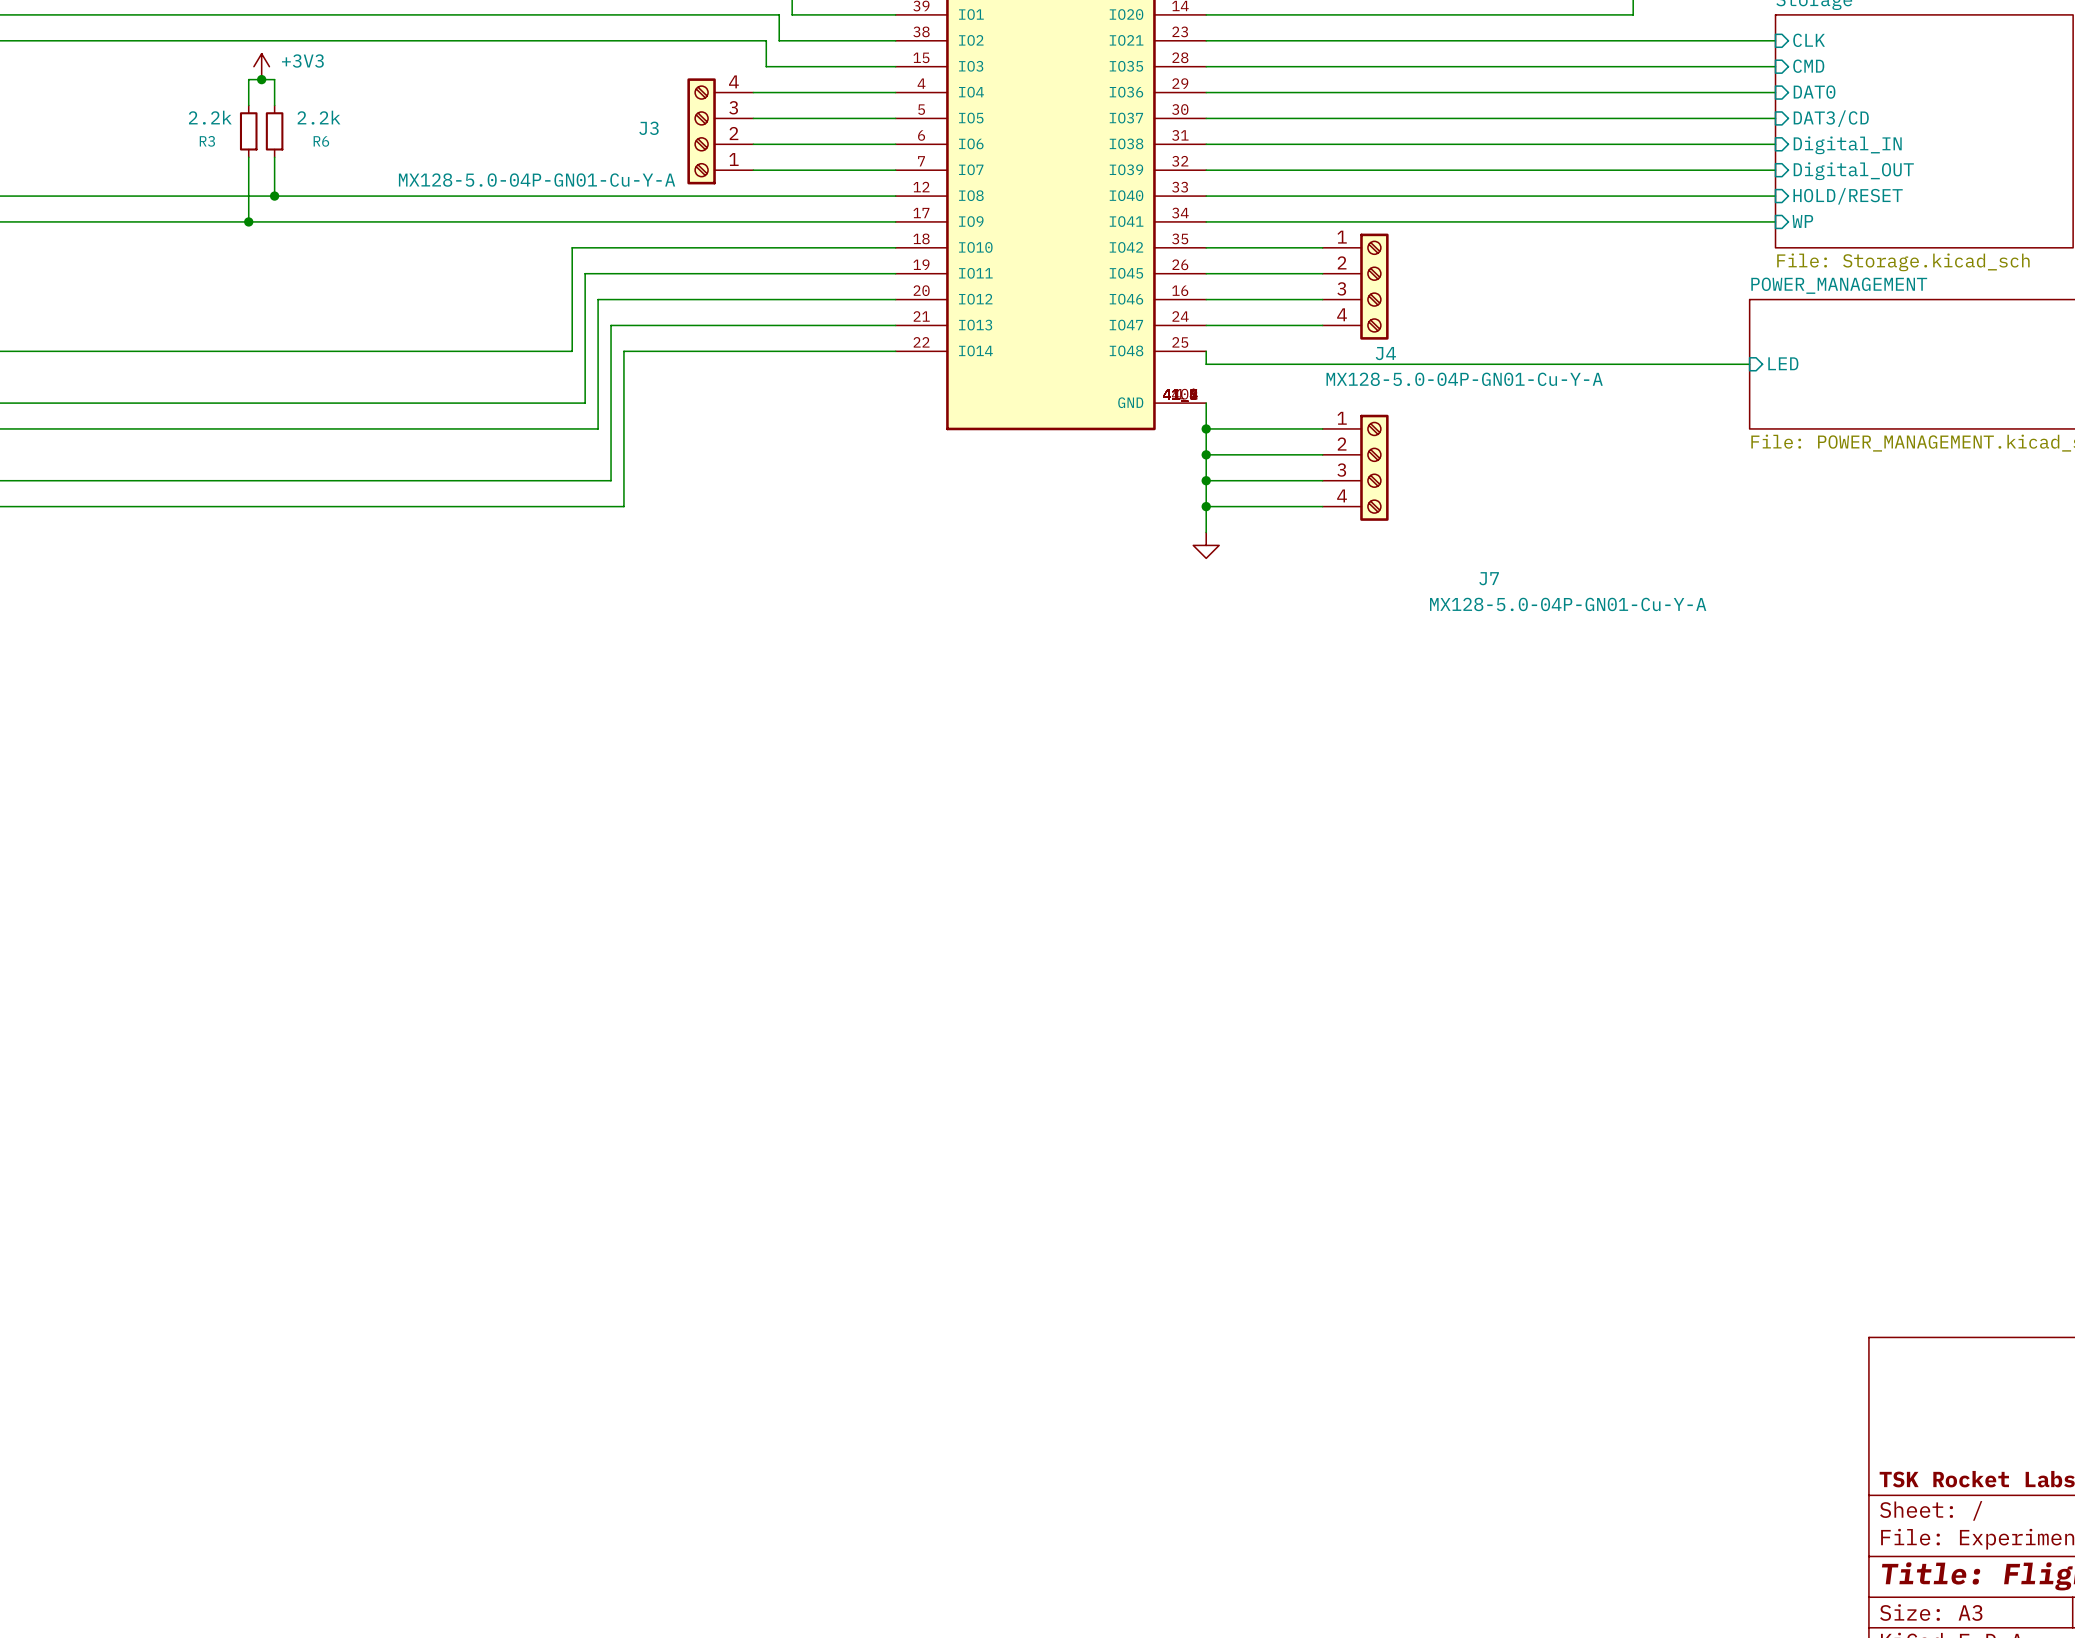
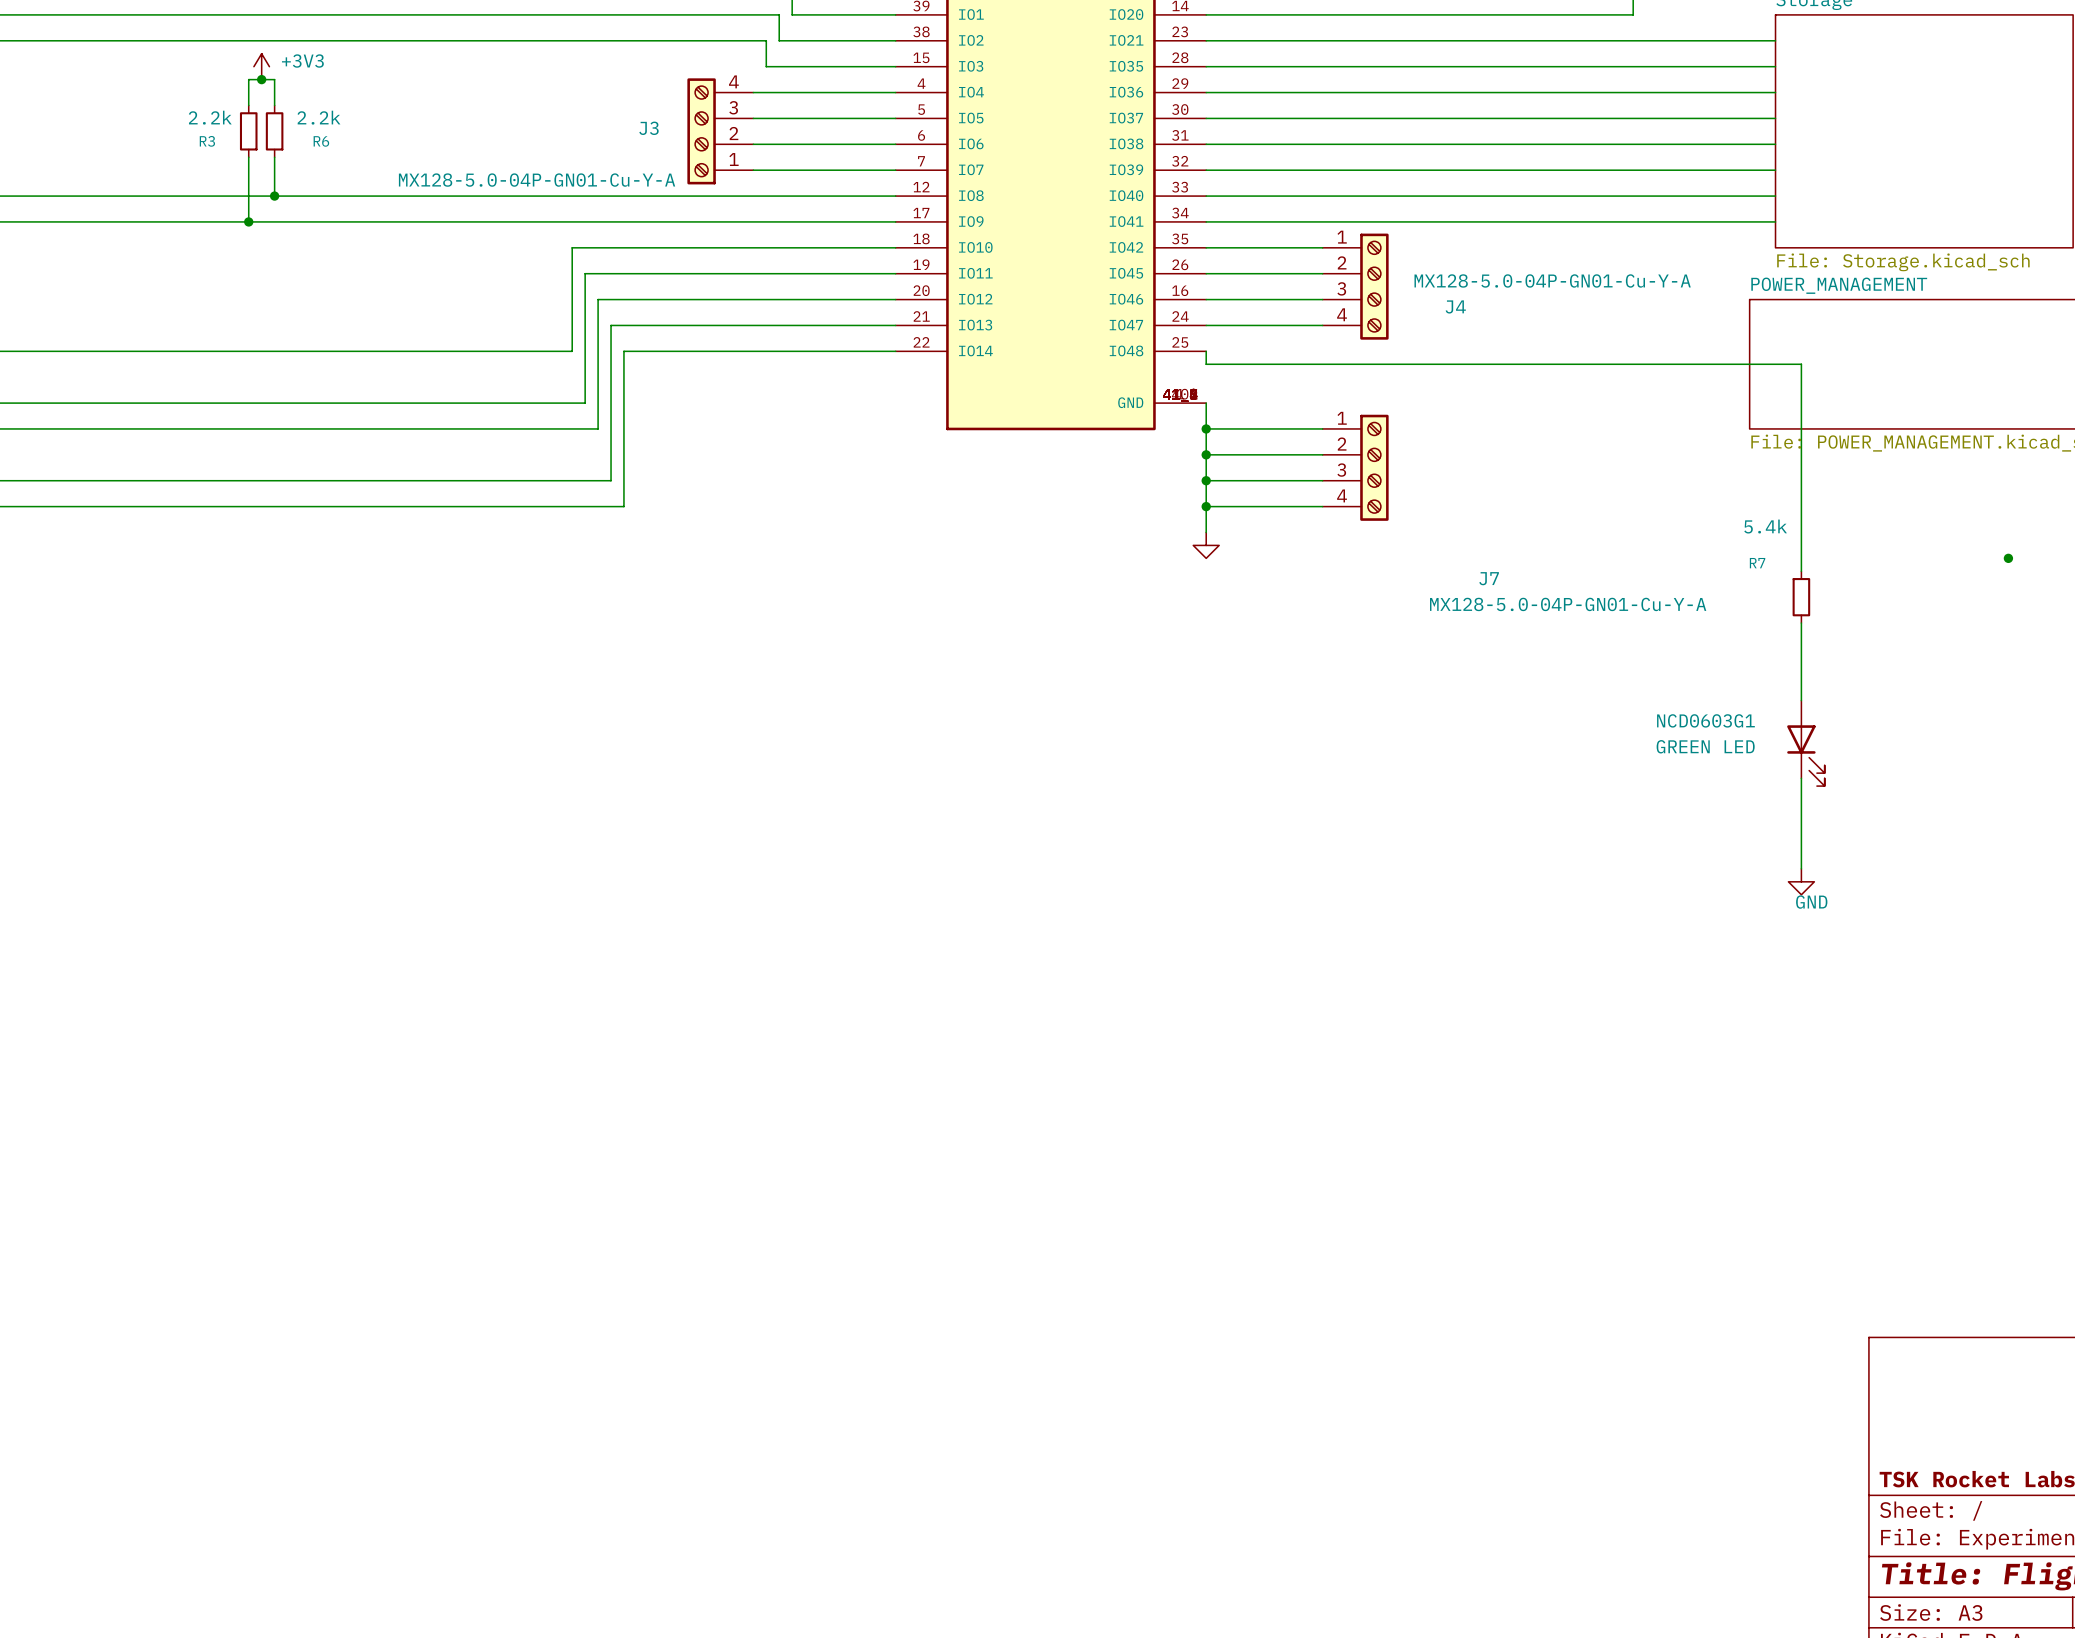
sheet pin: CLK (1809, 40) -> none
sheet pin: CMD (1808, 66) -> none
sheet pin: DAT0 (1814, 92) -> none
sheet pin: DAT3/CD (1831, 118) -> none
sheet pin: Digital_IN (1847, 145) -> none
sheet pin: Digital_OUT (1853, 171) -> none
sheet pin: HOLD/RESET (1848, 196) -> none
sheet pin: WP (1802, 221) -> none
J4 name position: J4 (1385, 353) -> J4 (1455, 306)
sheet pin: LED (1783, 363) -> none
wire: none -> (1749, 364) (1801, 364) (1801, 571)
J4 value position: MX128-5.0-04P-GN01-Cu-Y-A (1464, 379) -> MX128-5.0-04P-GN01-Cu-Y-A (1552, 280)
junction: none -> (2008, 558)
R7: none -> 5.4k (1801, 597)
wire: none -> (1801, 623) (1801, 700)
NCD0603G1: none -> GREEN LED (1805, 743)
wire: none -> (1801, 778) (1801, 868)
power symbol: none -> GND (1801, 881)

